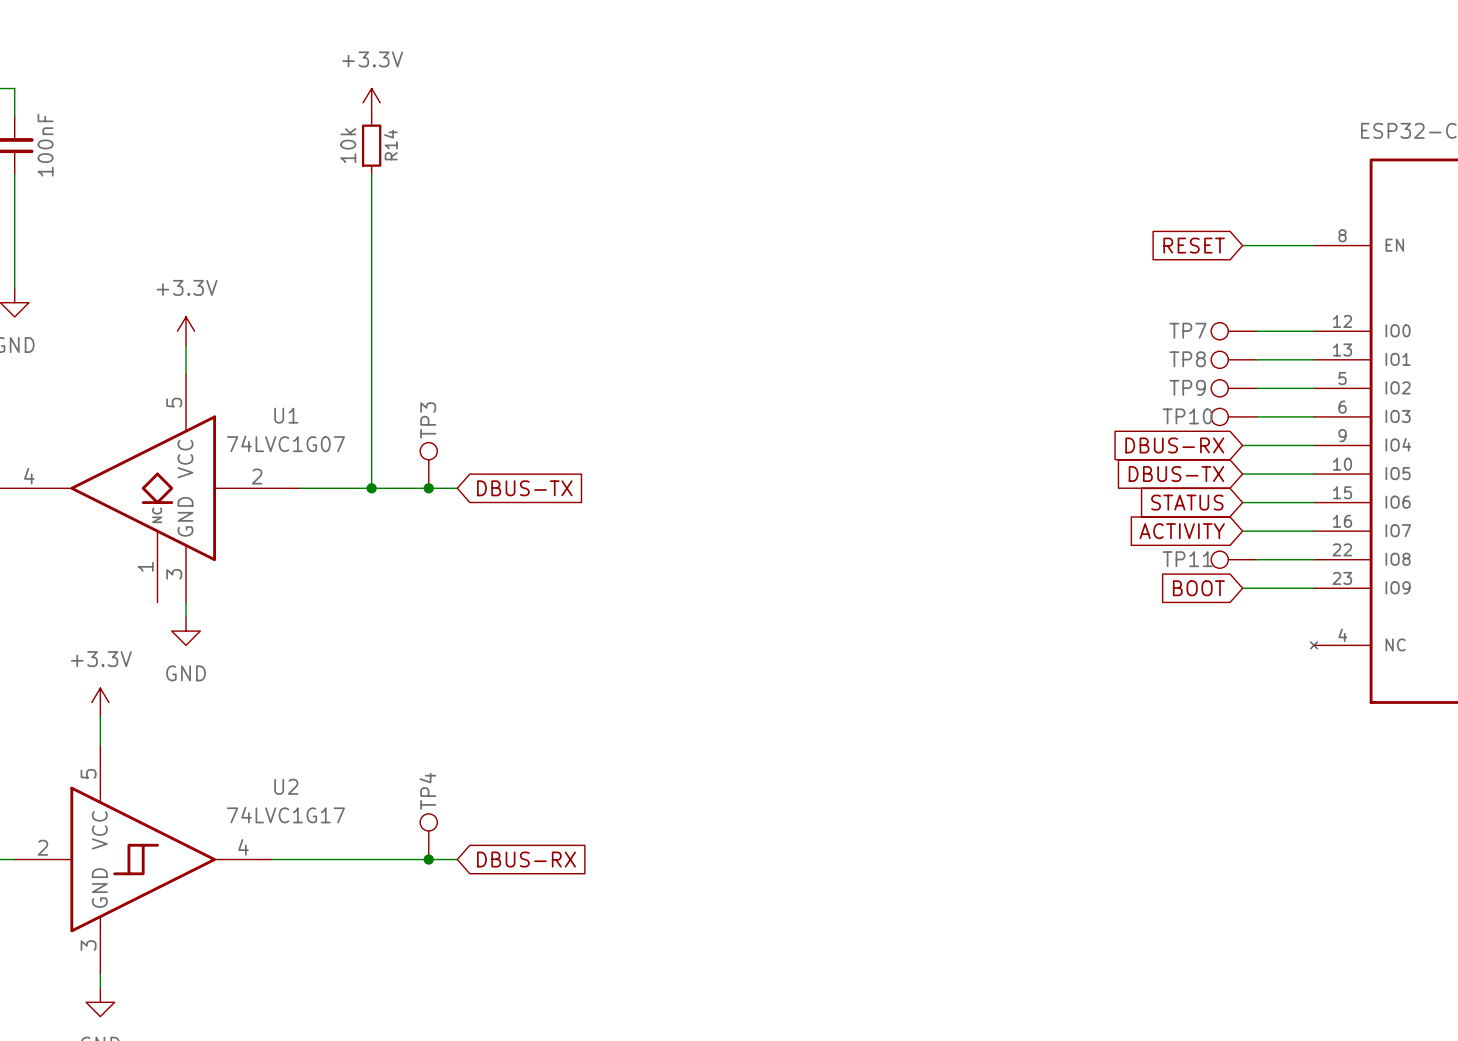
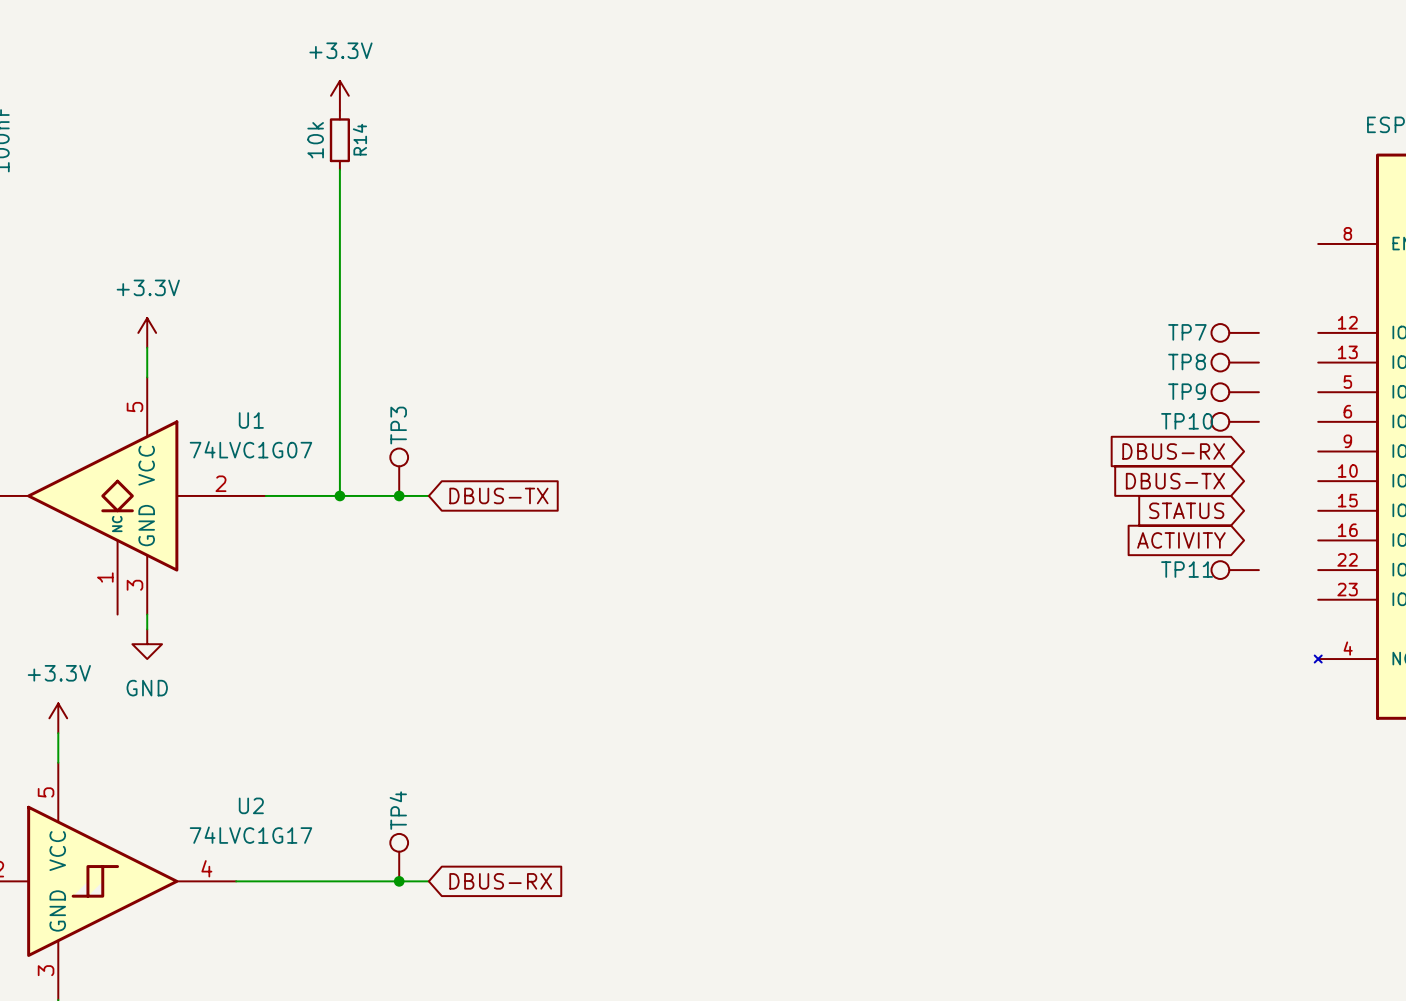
global label: RESET (1194, 245) -> none
wire: (1242, 245) (1313, 245) -> none
wire: (1256, 331) (1313, 331) -> none
wire: (1256, 359) (1313, 359) -> none
wire: (1256, 388) (1313, 388) -> none
wire: (1256, 416) (1313, 416) -> none
wire: (1242, 445) (1313, 445) -> none
wire: (1242, 474) (1313, 474) -> none
wire: (1242, 502) (1313, 502) -> none
wire: (1242, 531) (1313, 531) -> none
wire: (1256, 559) (1313, 559) -> none
global label: BOOT (1198, 588) -> none
wire: (1242, 588) (1313, 588) -> none

